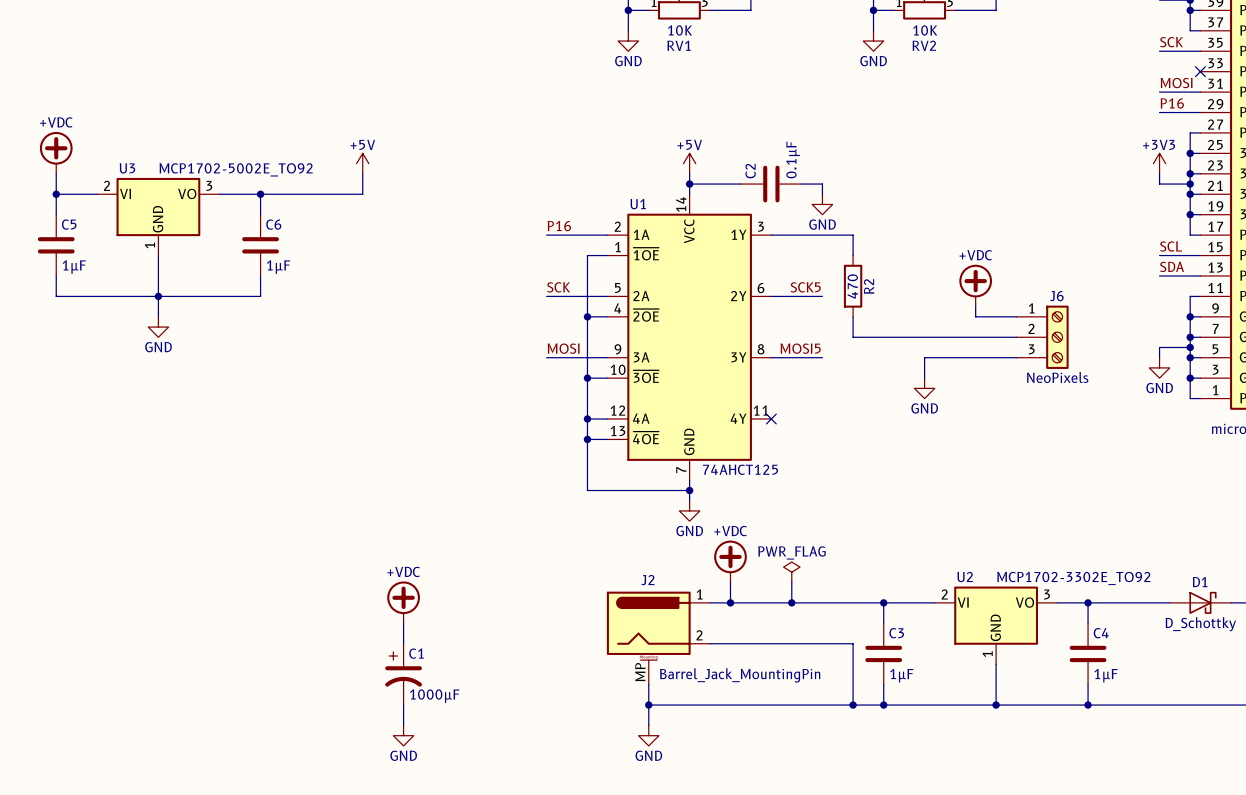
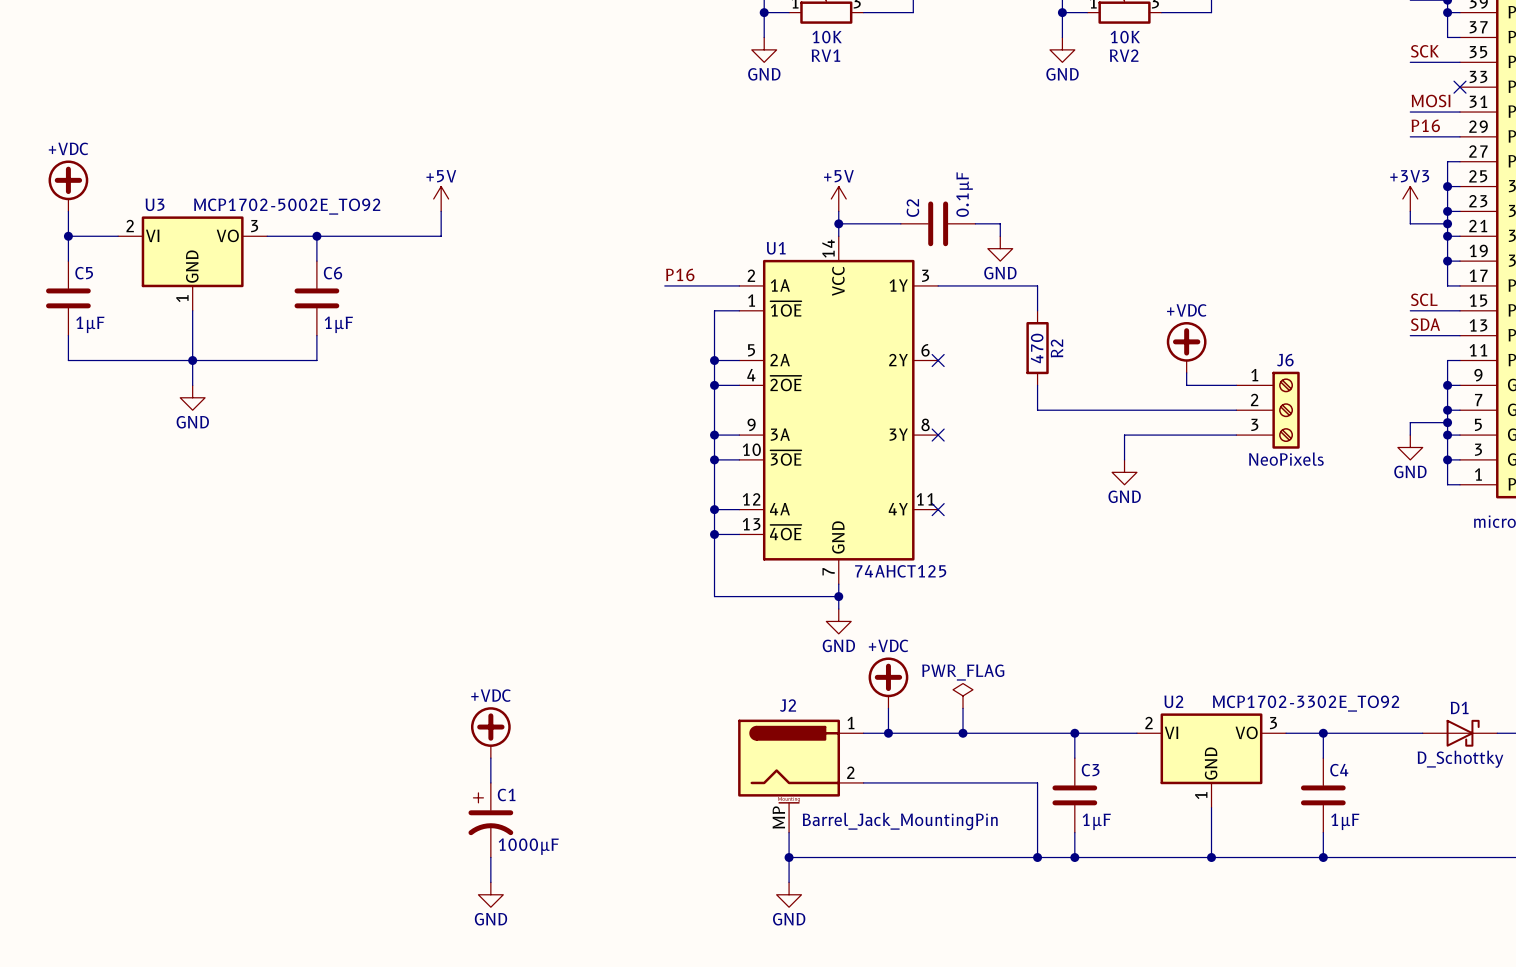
label: SCK (558, 287) -> none
label: SCK5 (805, 287) -> none
wire: (546, 296) (587, 296) -> none
junction: none -> (714, 360)
wire: (771, 296) (822, 296) -> none
no-connect mark: none -> (938, 360)
label: MOSI (563, 348) -> none
label: MOSI5 (800, 348) -> none
wire: (546, 357) (587, 357) -> none
junction: none -> (714, 435)
wire: (771, 357) (822, 357) -> none
no-connect mark: none -> (938, 435)

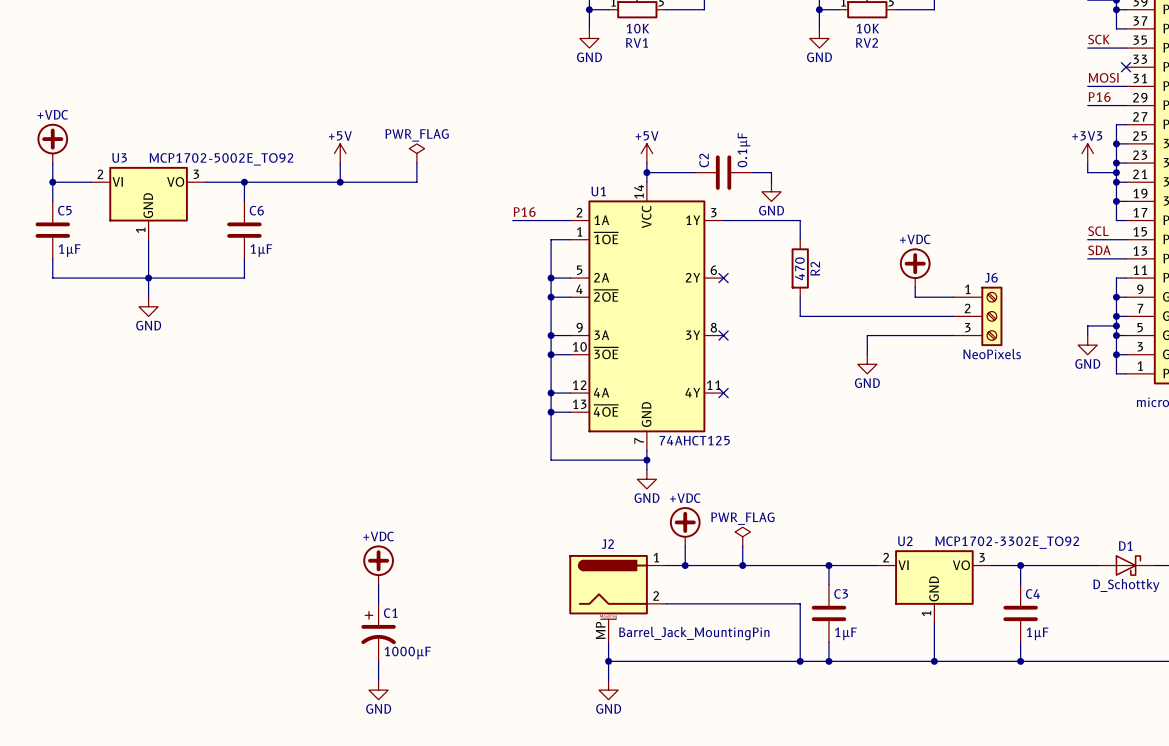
power symbol: none -> PWR_FLAG (416, 153)
wire: none -> (416, 163) (416, 182) (340, 182)
junction: none -> (340, 182)

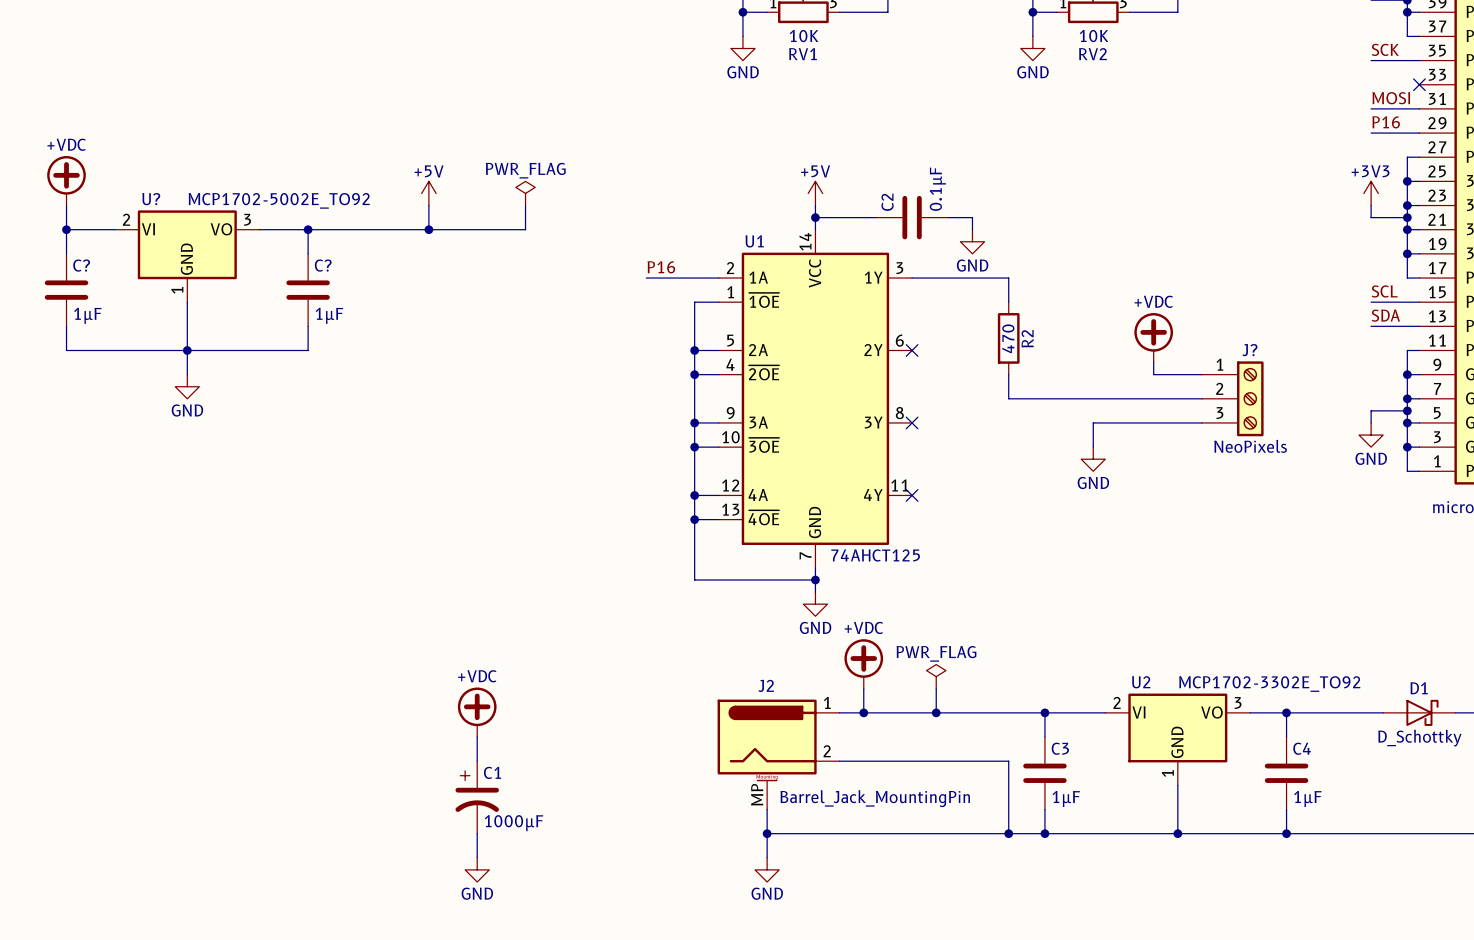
U3 name: U3 (119, 157) -> U? (151, 199)
C5 name: C5 (64, 210) -> C? (81, 265)
C6 name: C6 (256, 210) -> C? (323, 265)
J6 name: J6 (991, 277) -> J? (1249, 350)

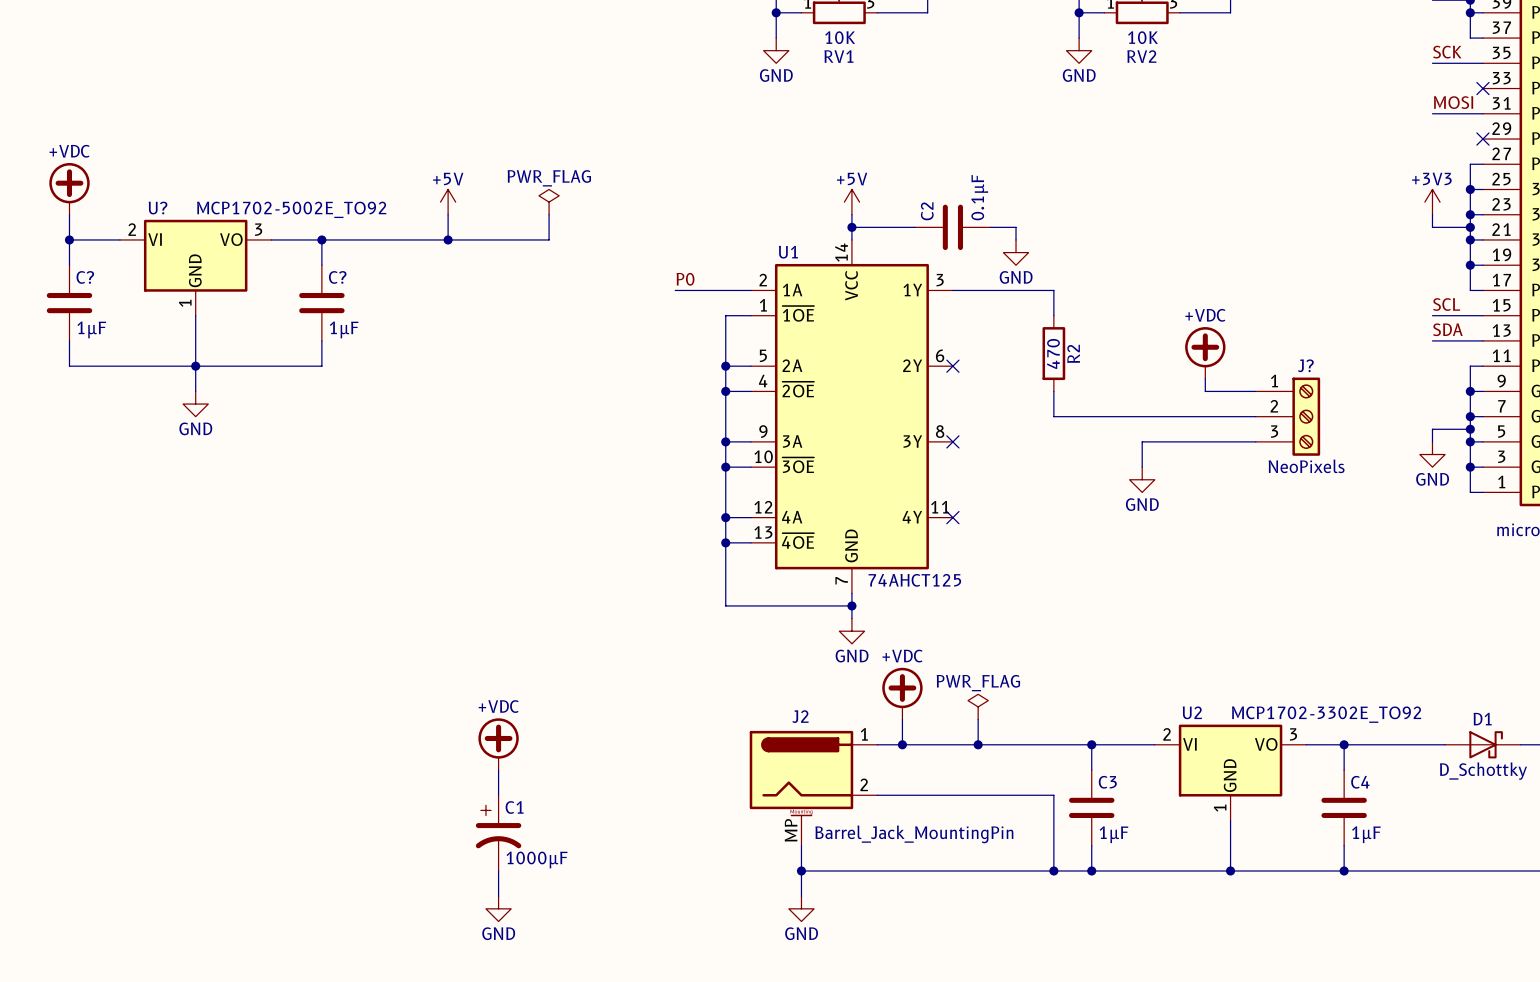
label: P16 (1386, 122) -> none
wire: (1371, 133) (1419, 133) -> none
no-connect mark: none -> (1482, 139)
label: P16 (661, 267) -> P0 (685, 279)

